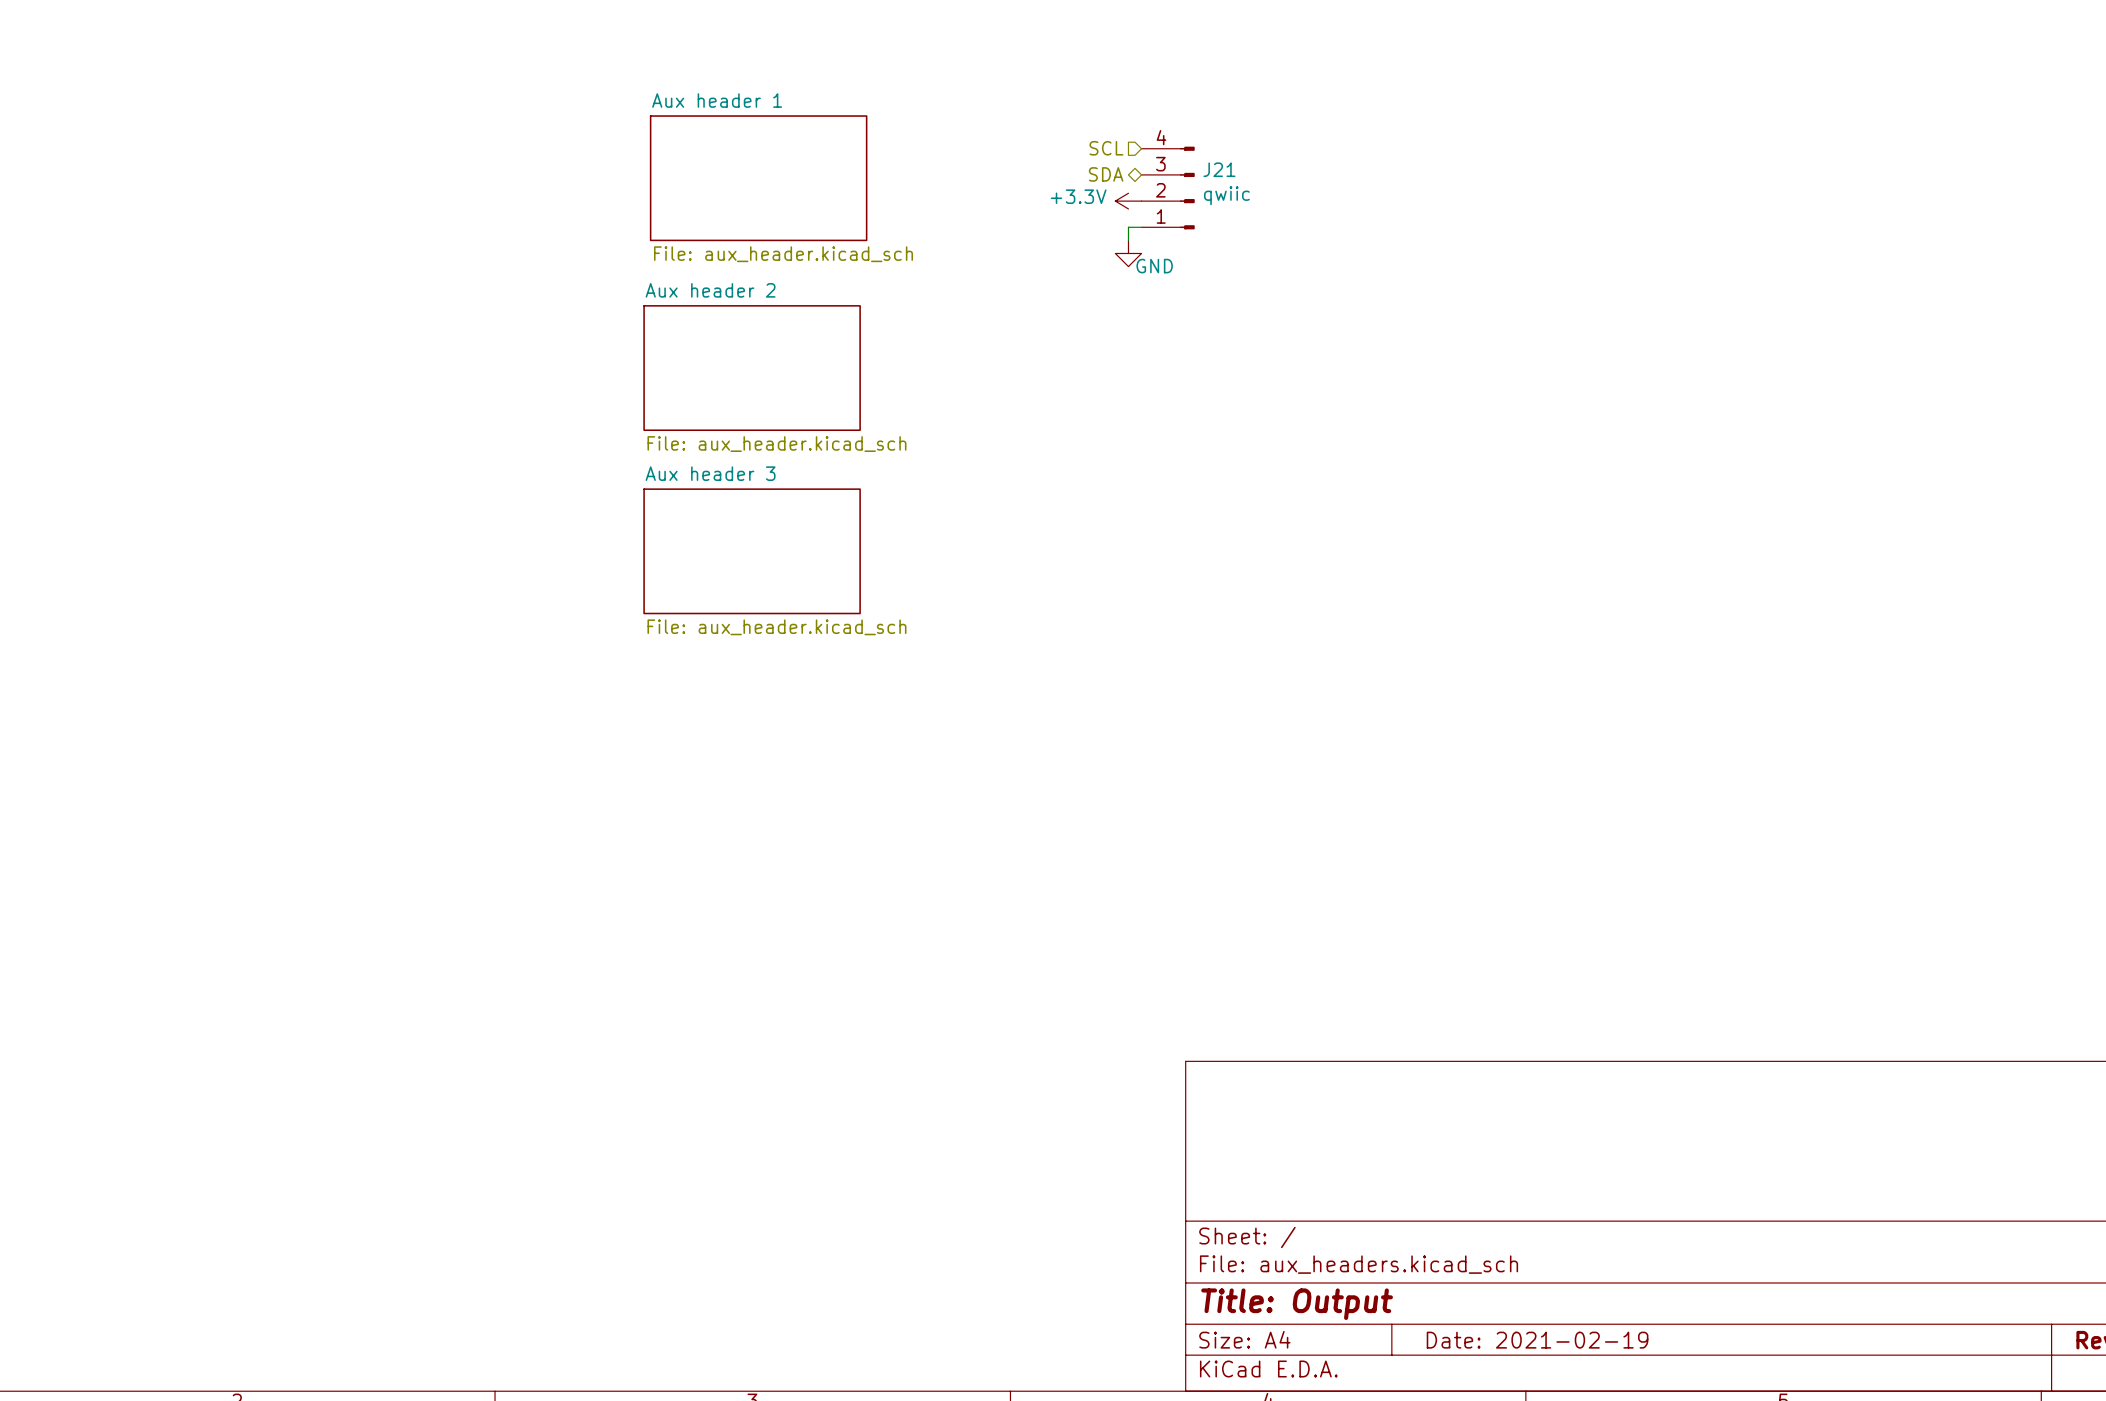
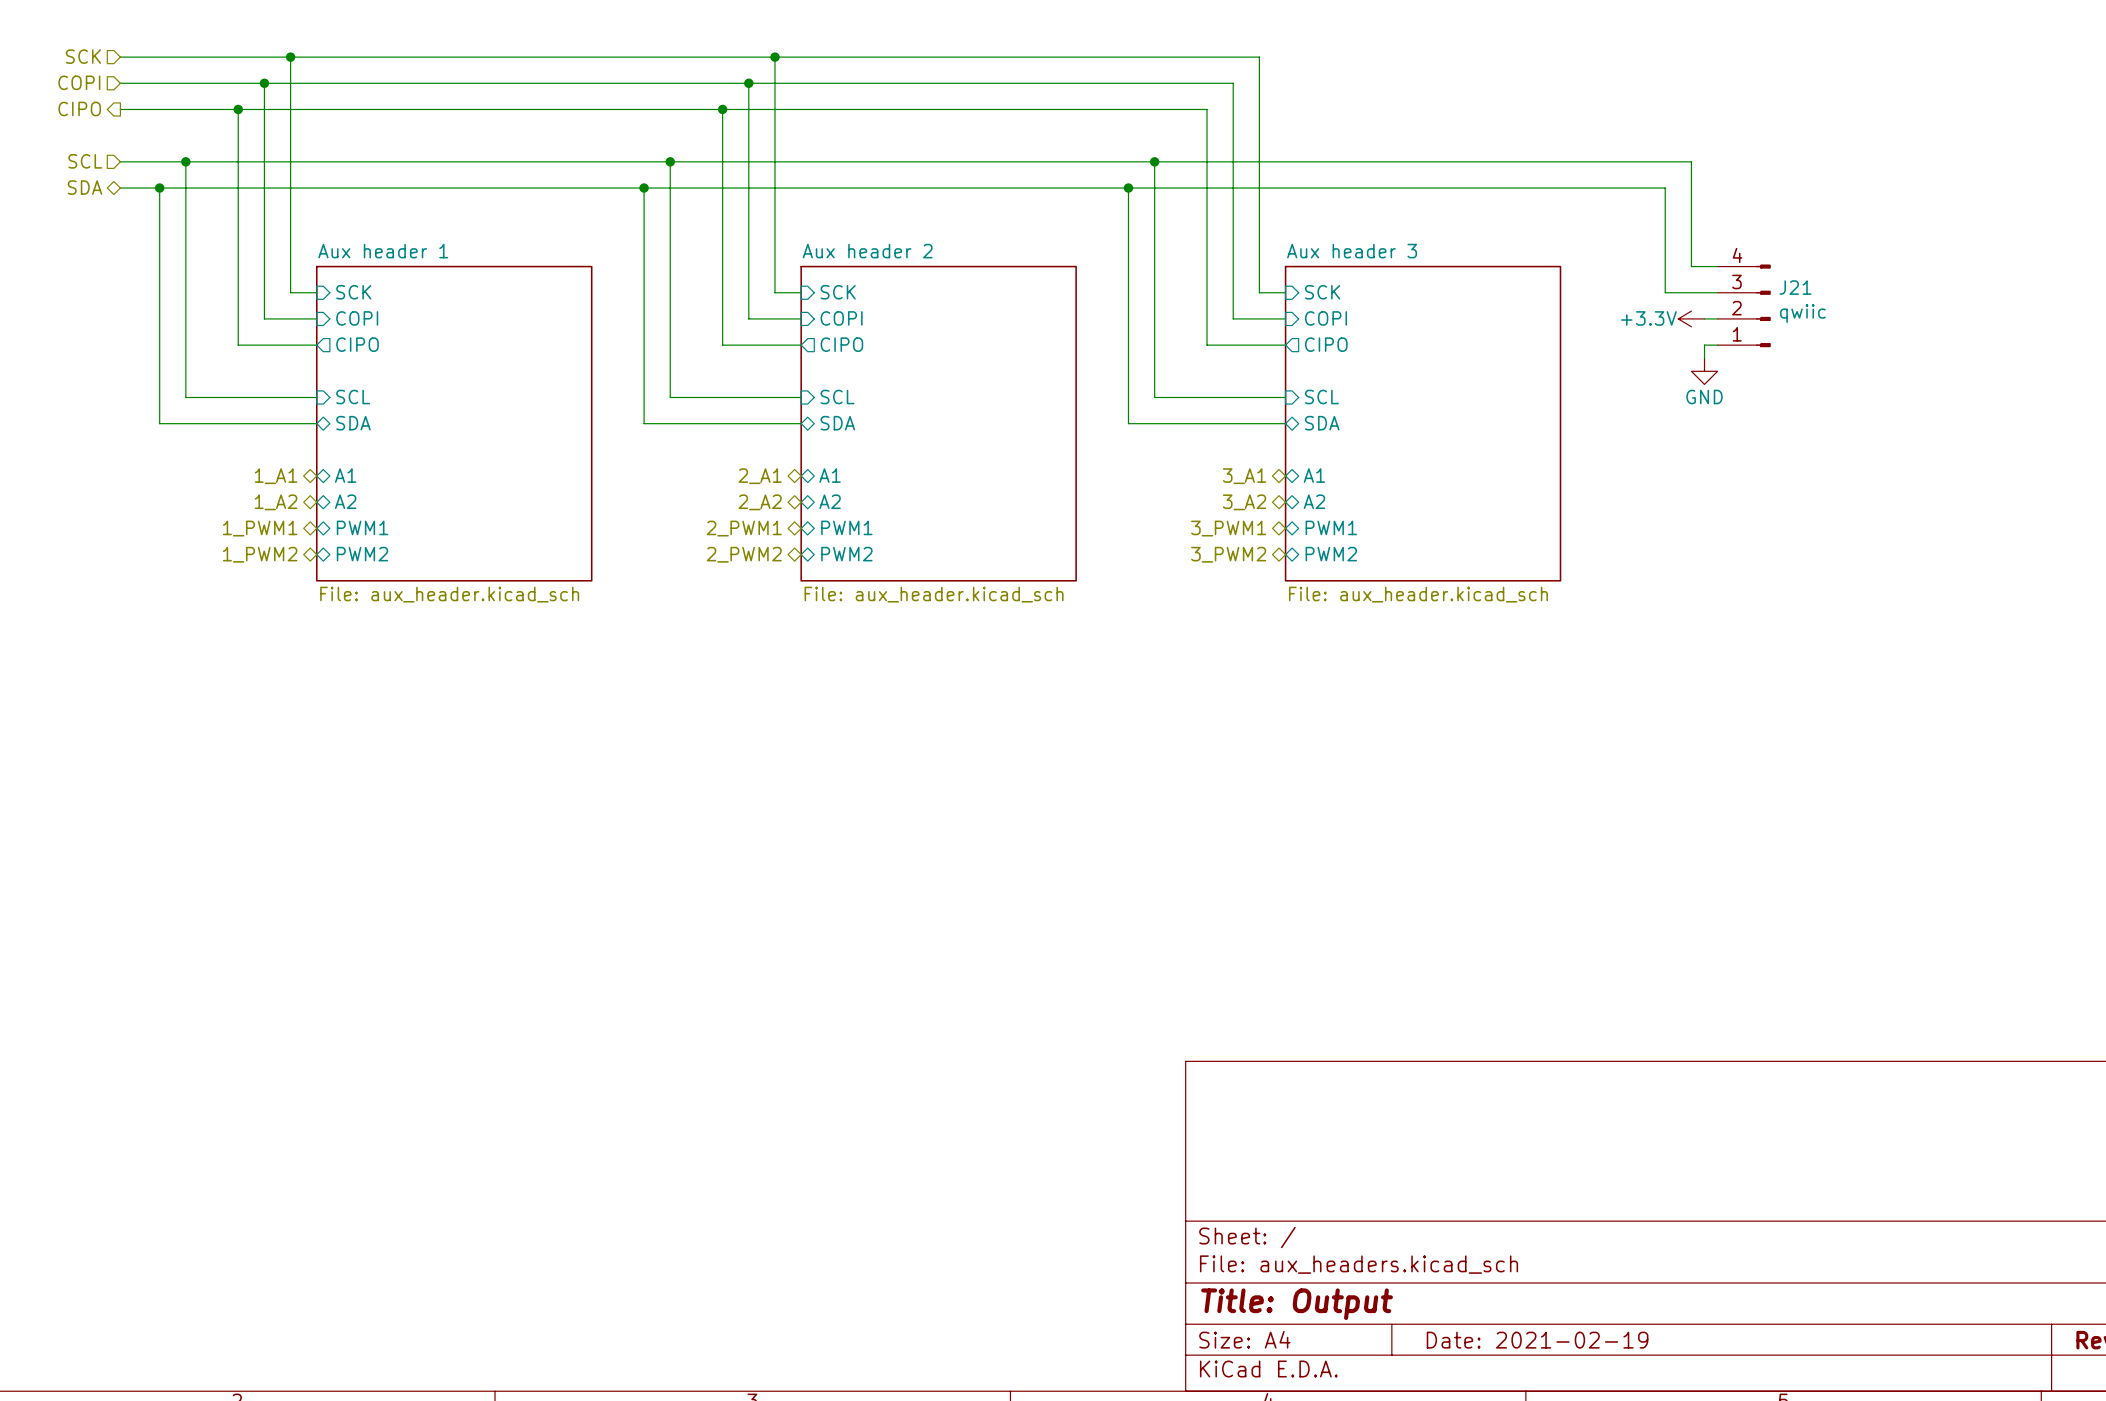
hierarchical label: none -> SCK (83, 56)
wire: none -> (120, 57) (1259, 57) (1259, 292) (1285, 292)
wire: none -> (290, 57) (290, 292) (316, 292)
junction: none -> (290, 57)
wire: none -> (774, 57) (774, 292) (801, 292)
junction: none -> (774, 57)
hierarchical label: none -> COPI (79, 82)
wire: none -> (120, 83) (1233, 83) (1233, 318) (1285, 318)
wire: none -> (264, 83) (264, 318) (316, 318)
junction: none -> (264, 83)
wire: none -> (748, 83) (748, 318) (801, 318)
junction: none -> (748, 83)
sheet Aux header 1 name position: Aux header 1 (717, 100) -> Aux header 1 (383, 251)
hierarchical label: none -> CIPO (79, 108)
wire: none -> (120, 109) (1207, 109) (1207, 345) (1285, 345)
wire: none -> (238, 109) (238, 345) (316, 345)
junction: none -> (238, 109)
wire: none -> (722, 109) (722, 345) (801, 345)
junction: none -> (722, 109)
sheet Aux header 1 shape: [649, 115, 868, 242] -> [315, 265, 593, 582]
hierarchical label: SCL (1106, 148) -> none
hierarchical label: none -> SCL (85, 161)
wire: none -> (120, 161) (1691, 161) (1691, 266) (1717, 266)
wire: none -> (185, 161) (185, 397) (316, 397)
junction: none -> (185, 161)
wire: none -> (670, 161) (670, 397) (801, 397)
junction: none -> (670, 161)
wire: none -> (1154, 161) (1154, 397) (1285, 397)
junction: none -> (1154, 161)
hierarchical label: SDA (1106, 174) -> none
hierarchical label: none -> SDA (84, 187)
wire: none -> (120, 188) (1665, 188) (1665, 292) (1717, 292)
wire: none -> (159, 188) (159, 423) (316, 423)
junction: none -> (159, 188)
wire: none -> (644, 188) (644, 423) (801, 423)
junction: none -> (644, 188)
junction: none -> (1128, 188)
J21 position: (1168, 188) -> (1744, 305)
power symbol: +3.3V (1128, 201) -> none
wire: (1128, 227) (1141, 227) -> (1128, 227) (1128, 188)
wire: none -> (1128, 240) (1128, 423) (1285, 423)
power symbol: GND (1128, 253) -> none
sheet Aux header 1 value position: File: aux_header.kicad_sch (783, 254) -> File: aux_header.kicad_sch (449, 594)
sheet Aux header 2 name position: Aux header 2 (710, 290) -> Aux header 2 (867, 251)
sheet pin: none -> SCK (353, 292)
sheet pin: none -> SCK (838, 292)
sheet pin: none -> SCK (1322, 292)
sheet Aux header 2 shape: [643, 305, 861, 432] -> [800, 265, 1077, 582]
sheet pin: none -> COPI (357, 318)
sheet pin: none -> COPI (841, 318)
sheet pin: none -> COPI (1325, 318)
power symbol: none -> +3.3V (1691, 318)
wire: none -> (1704, 318) (1717, 318)
sheet pin: none -> CIPO (357, 344)
sheet pin: none -> CIPO (841, 344)
sheet pin: none -> CIPO (1326, 344)
wire: none -> (1717, 345) (1704, 345) (1704, 358)
power symbol: none -> GND (1704, 371)
sheet pin: none -> SCL (353, 397)
sheet pin: none -> SCL (837, 397)
sheet pin: none -> SCL (1321, 397)
sheet pin: none -> SDA (353, 423)
sheet pin: none -> SDA (837, 423)
sheet pin: none -> SDA (1322, 423)
sheet Aux header 2 value position: File: aux_header.kicad_sch (776, 444) -> File: aux_header.kicad_sch (934, 594)
sheet Aux header 3 name position: Aux header 3 (710, 473) -> Aux header 3 (1352, 251)
sheet pin: none -> A1 (345, 475)
sheet pin: none -> A1 (830, 475)
sheet pin: none -> A1 (1314, 475)
hierarchical label: none -> 1_A1 (276, 476)
hierarchical label: none -> 2_A1 (760, 476)
hierarchical label: none -> 3_A1 (1244, 476)
sheet Aux header 3 shape: [643, 488, 861, 615] -> [1284, 265, 1562, 582]
sheet pin: none -> A2 (345, 501)
sheet pin: none -> A2 (830, 501)
sheet pin: none -> A2 (1314, 501)
hierarchical label: none -> 1_A2 (276, 502)
hierarchical label: none -> 2_A2 (760, 502)
hierarchical label: none -> 3_A2 (1244, 502)
sheet pin: none -> PWM1 (362, 527)
sheet pin: none -> PWM1 (846, 527)
sheet pin: none -> PWM1 (1331, 527)
hierarchical label: none -> 1_PWM1 (260, 528)
hierarchical label: none -> 2_PWM1 (744, 528)
hierarchical label: none -> 3_PWM1 (1228, 528)
hierarchical label: none -> 1_PWM2 (260, 554)
sheet pin: none -> PWM2 (362, 554)
hierarchical label: none -> 2_PWM2 (744, 554)
sheet pin: none -> PWM2 (846, 554)
hierarchical label: none -> 3_PWM2 (1228, 554)
sheet pin: none -> PWM2 (1331, 554)
sheet Aux header 3 value position: File: aux_header.kicad_sch (776, 627) -> File: aux_header.kicad_sch (1418, 594)

